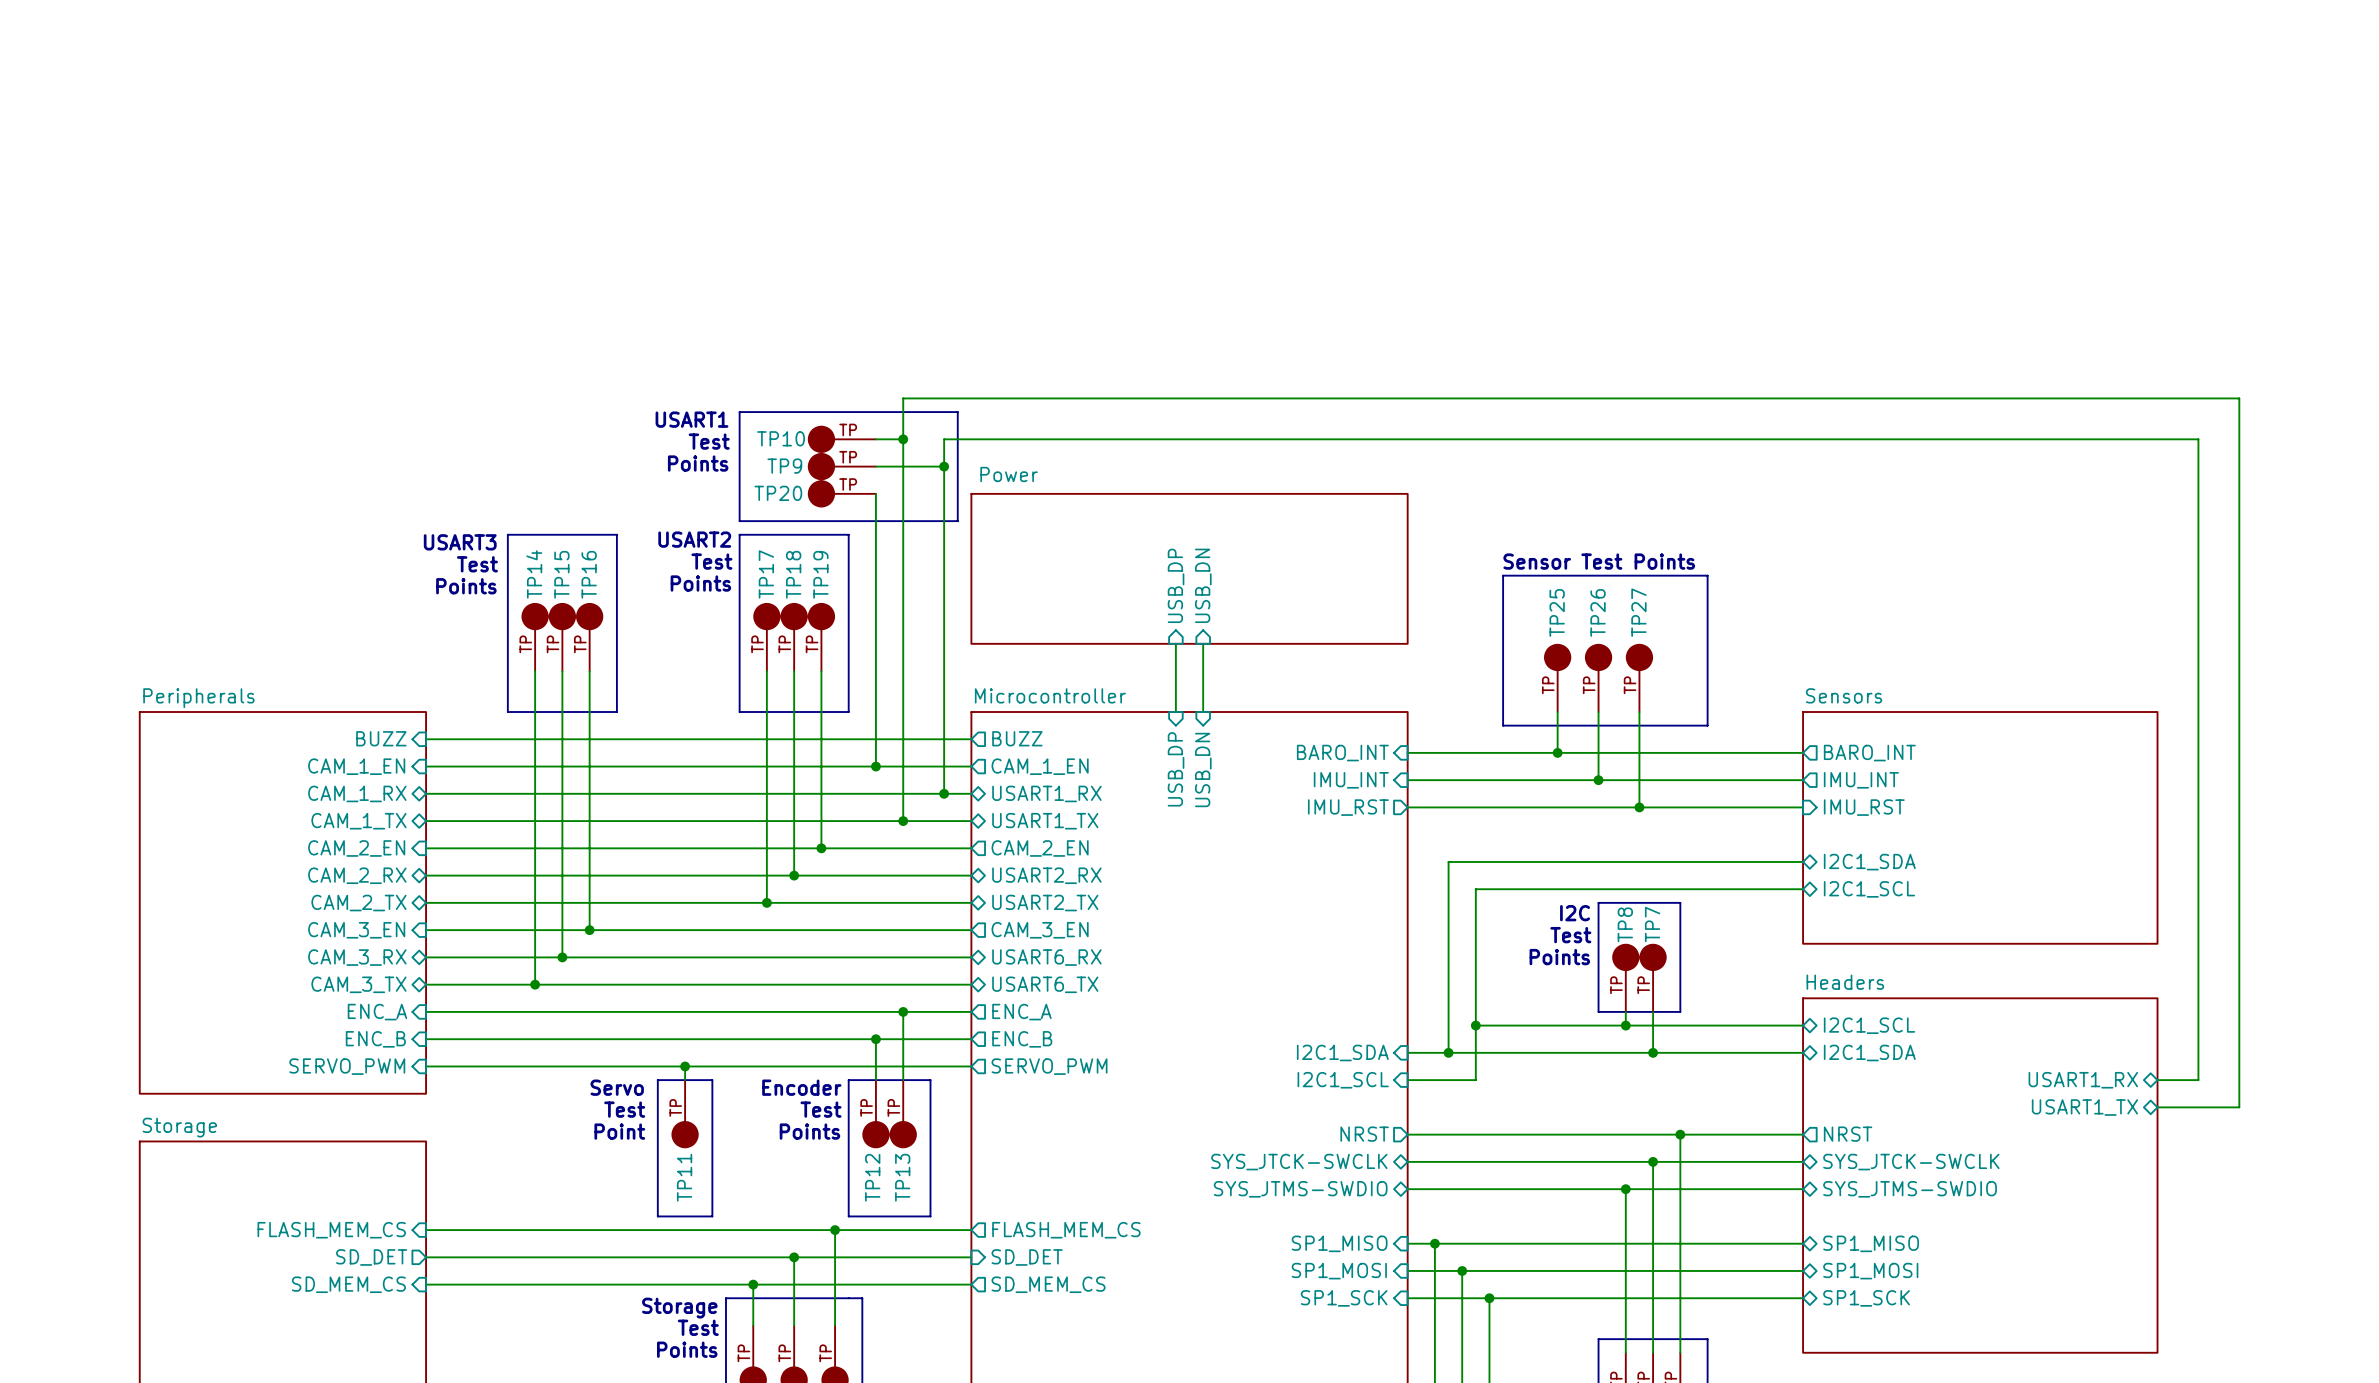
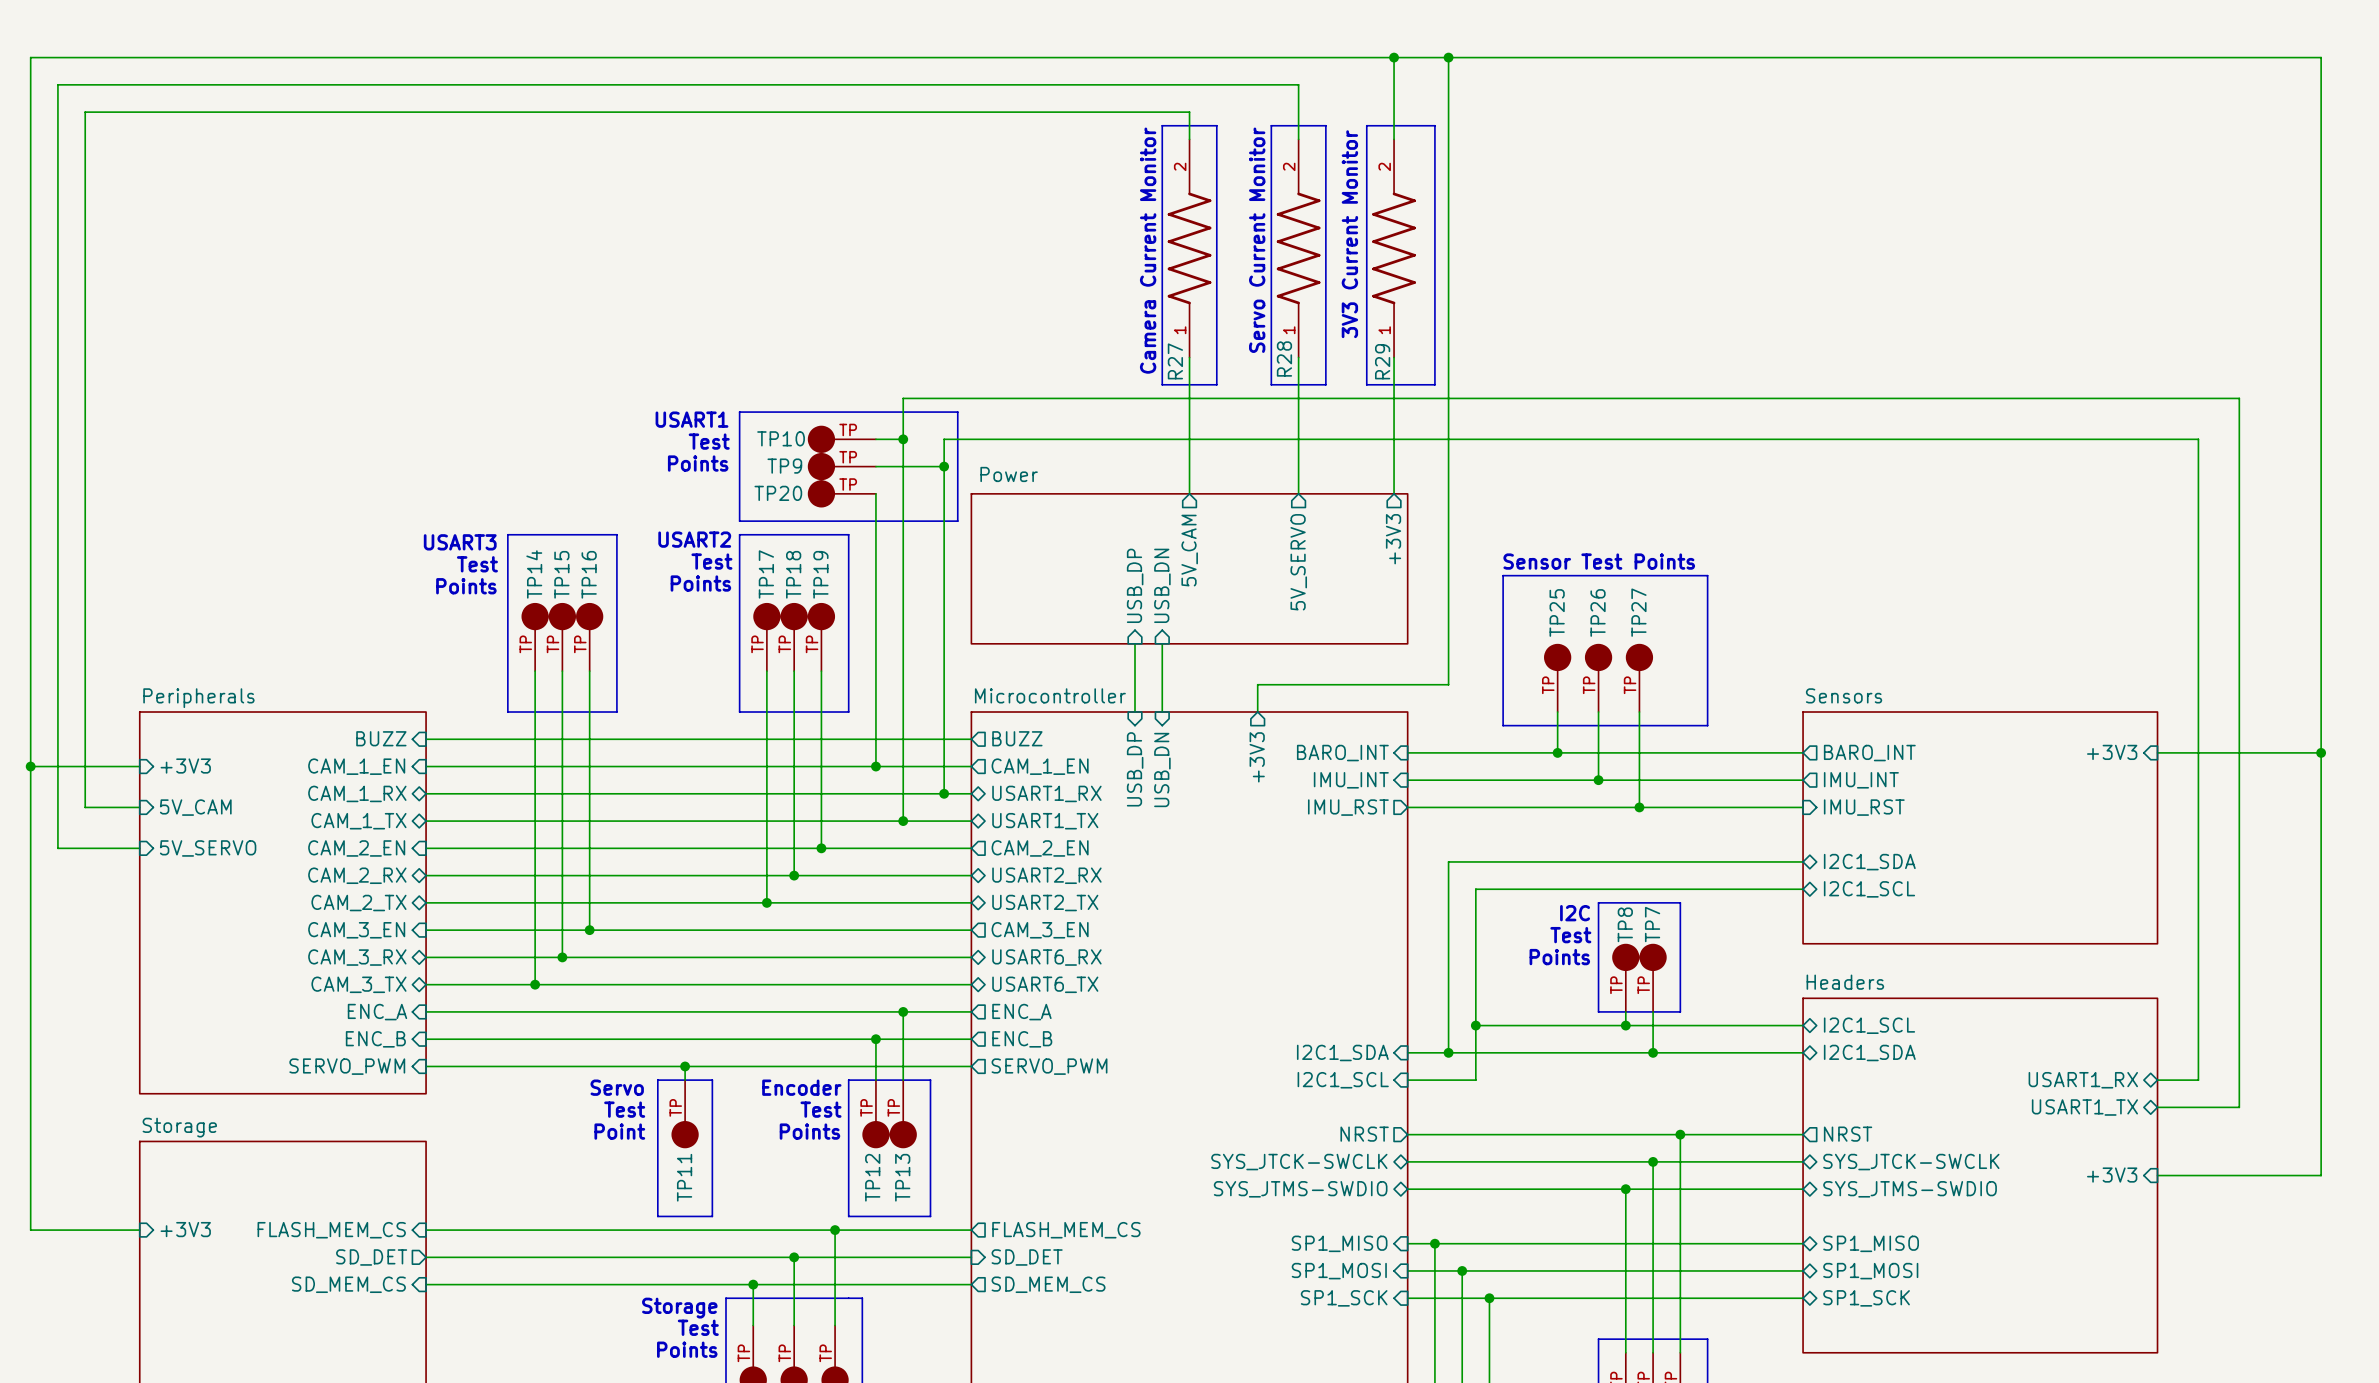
wire: none -> (1394, 57) (1394, 139)
junction: none -> (1394, 57)
wire: none -> (1448, 57) (1448, 684) (1257, 684) (1257, 712)
junction: none -> (1448, 57)
line: none -> (1162, 125) (1162, 384) (1216, 384) (1216, 125) (1162, 125)
line: none -> (1271, 125) (1325, 125) (1325, 384) (1271, 384) (1271, 125)
line: none -> (1366, 125) (1366, 384) (1434, 384) (1434, 125) (1366, 125)
wire: none -> (1189, 139) (1189, 112) (85, 112) (85, 807) (139, 807)
wire: none -> (1298, 139) (1298, 84) (57, 84) (57, 848) (139, 848)
text: none -> 3V3 Current Monitor (1349, 234)
text: none -> Servo Current Monitor (1257, 240)
R27: none -> (1189, 248)
R28: none -> (1298, 248)
R29: none -> (1394, 248)
text: none -> Camera Current Monitor (1148, 250)
wire: none -> (1189, 357) (1189, 493)
wire: none -> (1298, 357) (1298, 493)
wire: none -> (1394, 357) (1394, 493)
sheet pin: none -> +3V3 (1393, 539)
sheet pin: none -> 5V_CAM (1189, 550)
sheet pin: none -> 5V_SERVO (1298, 562)
sheet pin position: USB_DP (1176, 585) -> USB_DP (1135, 585)
sheet pin position: USB_DN (1203, 585) -> USB_DN (1162, 585)
wire: (1175, 643) (1175, 712) -> (1135, 643) (1135, 712)
wire: (1203, 643) (1203, 712) -> (1162, 643) (1162, 712)
sheet pin: none -> +3V3 (2112, 752)
wire: none -> (2157, 752) (2321, 752)
junction: none -> (2321, 752)
sheet pin: none -> +3V3 (1257, 757)
wire: none -> (30, 766) (139, 766)
junction: none -> (30, 766)
sheet pin: none -> +3V3 (185, 766)
sheet pin position: USB_DP (1176, 769) -> USB_DP (1135, 769)
sheet pin position: USB_DN (1203, 769) -> USB_DN (1162, 769)
sheet pin: none -> 5V_CAM (195, 807)
sheet pin: none -> 5V_SERVO (208, 848)
sheet pin: none -> +3V3 (2112, 1175)
wire: none -> (2157, 1175) (2321, 1175) (2321, 57) (30, 57) (30, 1230) (139, 1230)
sheet pin: none -> +3V3 (185, 1229)

